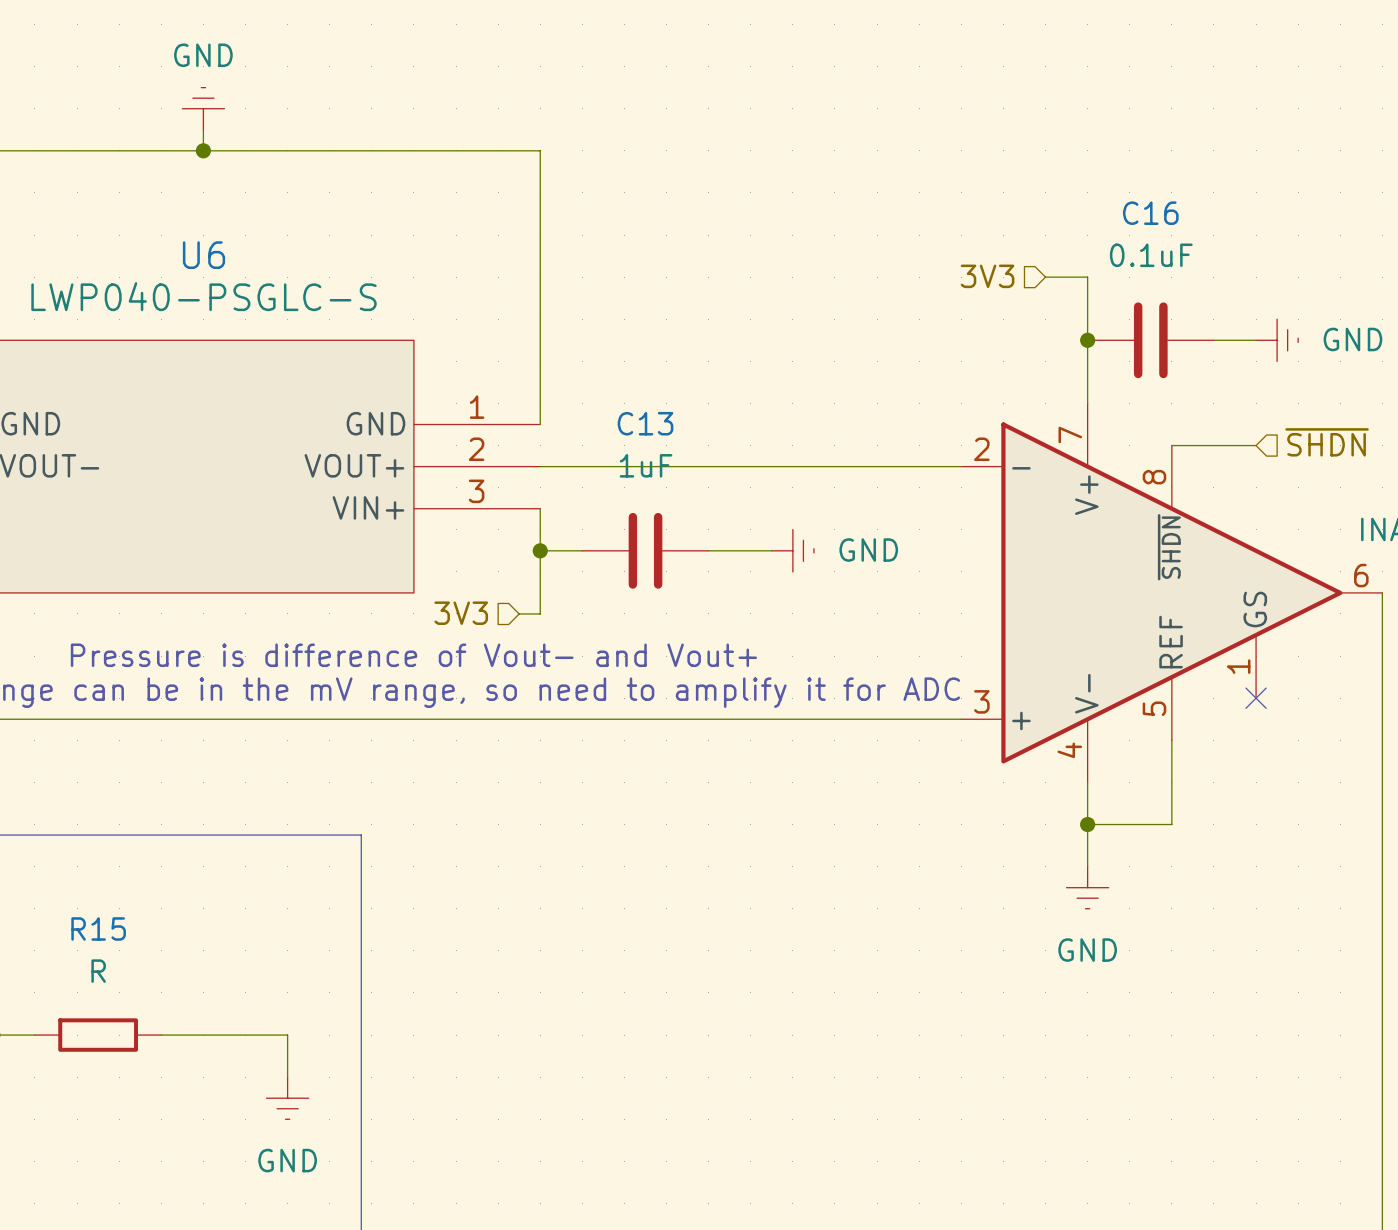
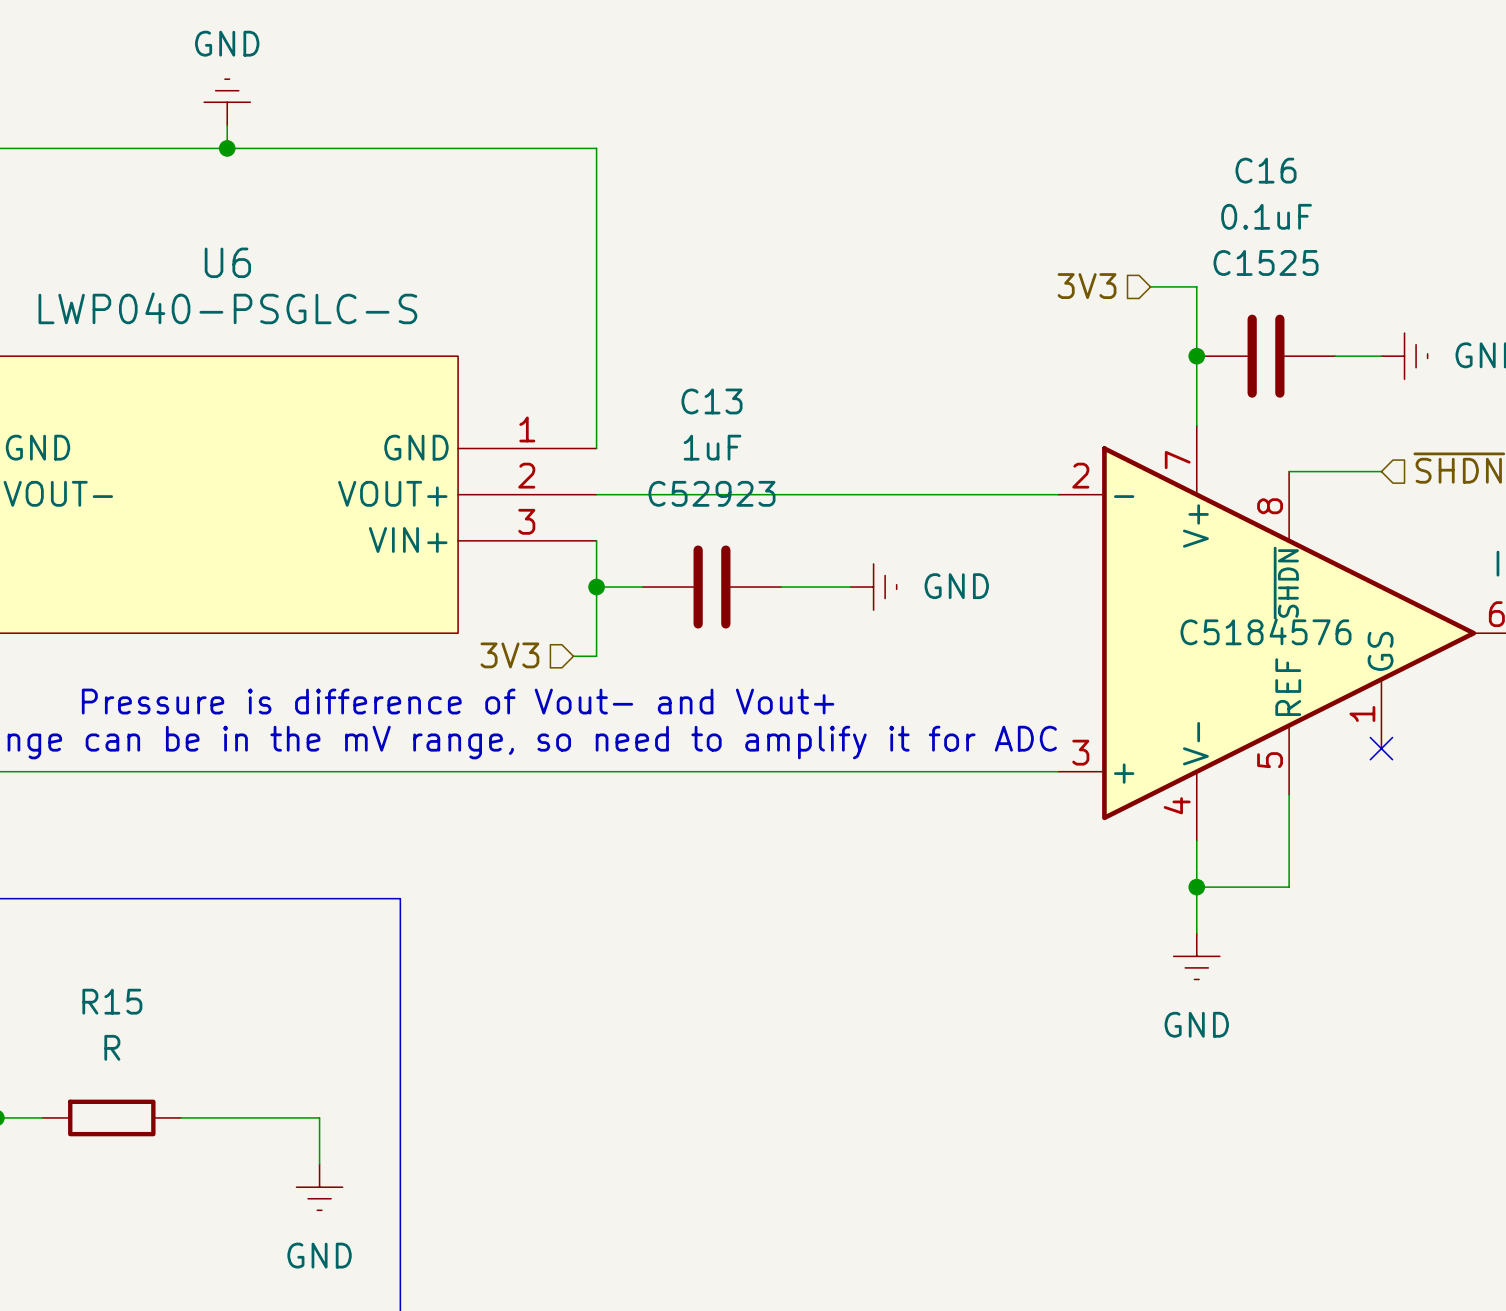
C16 name position: C16 (1150, 213) -> C16 (1266, 170)
C16 text: none -> C1525 (1266, 262)
C16 value position: 0.1uF (1151, 255) -> 0.1uF (1266, 216)
C13 name position: C13 (645, 423) -> C13 (711, 401)
C13 text: none -> C52923 (711, 493)
C13 value position: 1uF (646, 465) -> 1uF (712, 447)
part text: none -> C5184576 (1266, 631)

